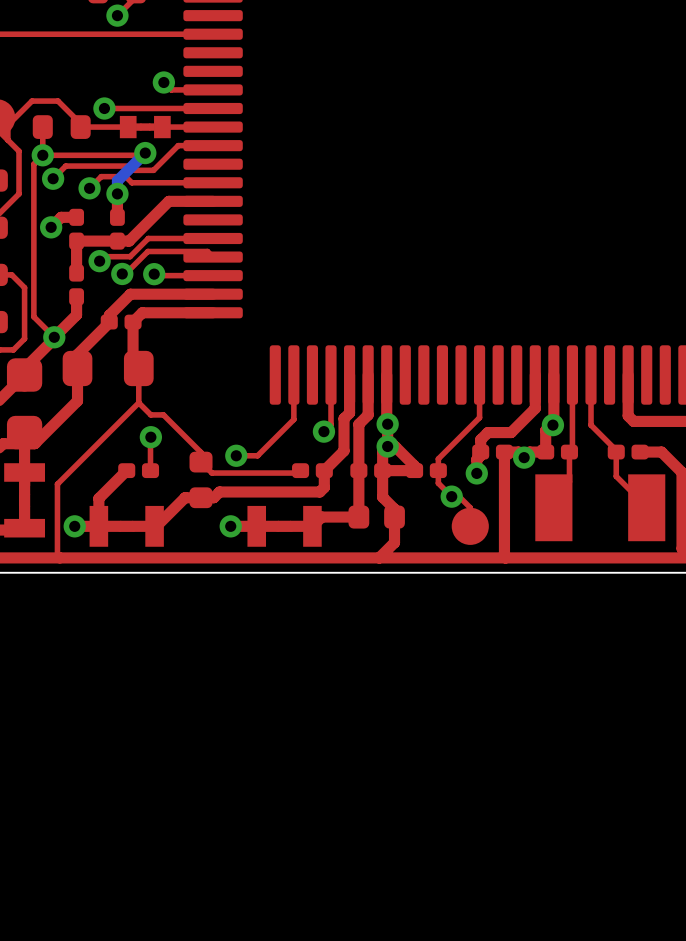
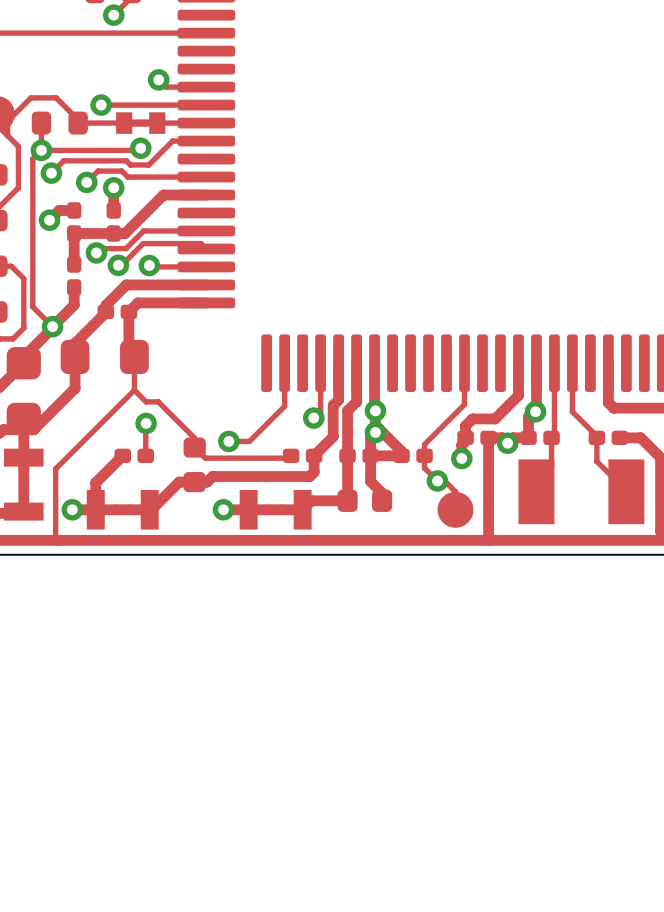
bottom track: (145, 153) (117, 180) (117, 193) -> none
top track: (394, 517) (394, 542) (379, 557) -> none

